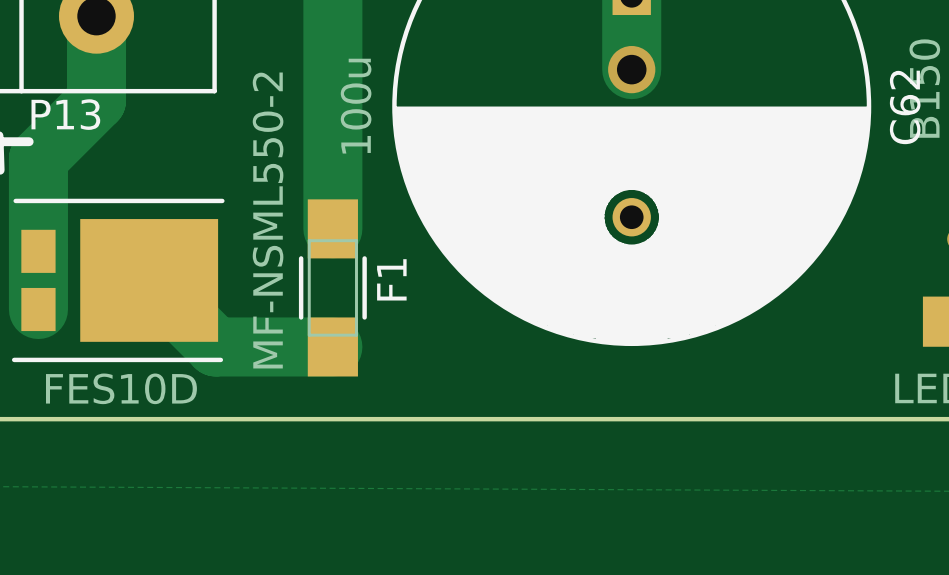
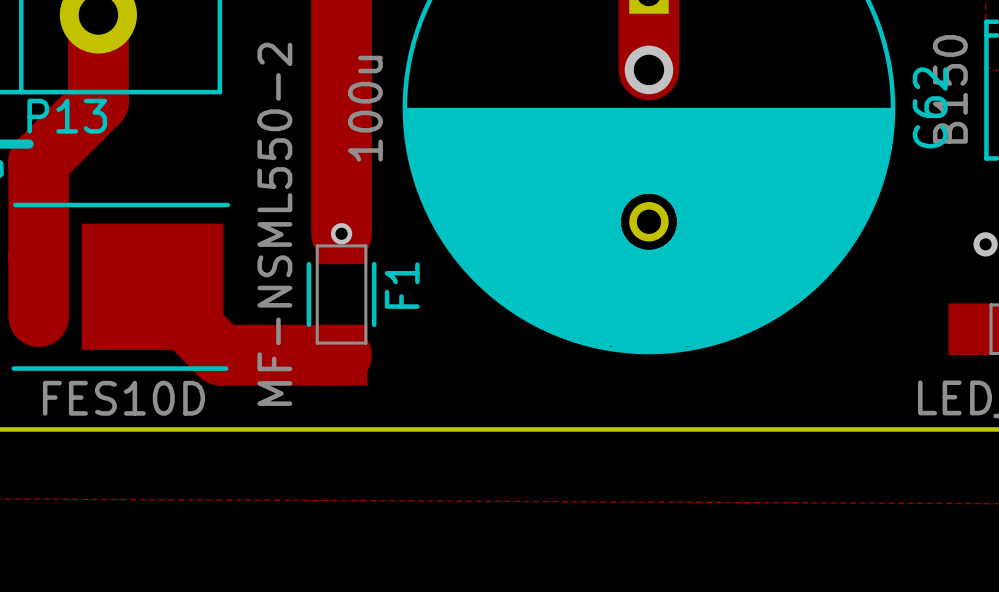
via: none -> (341, 233)

